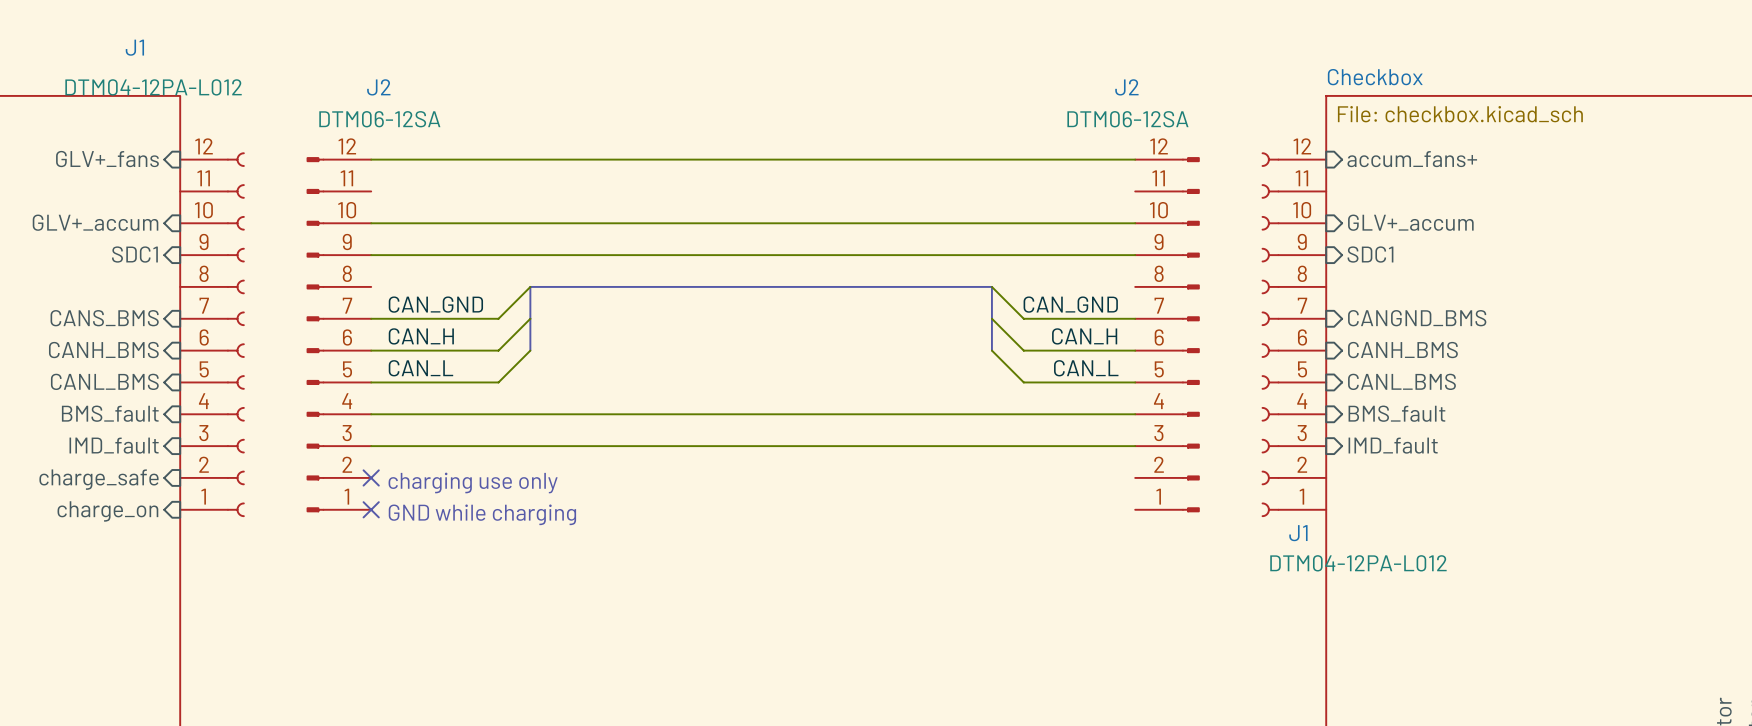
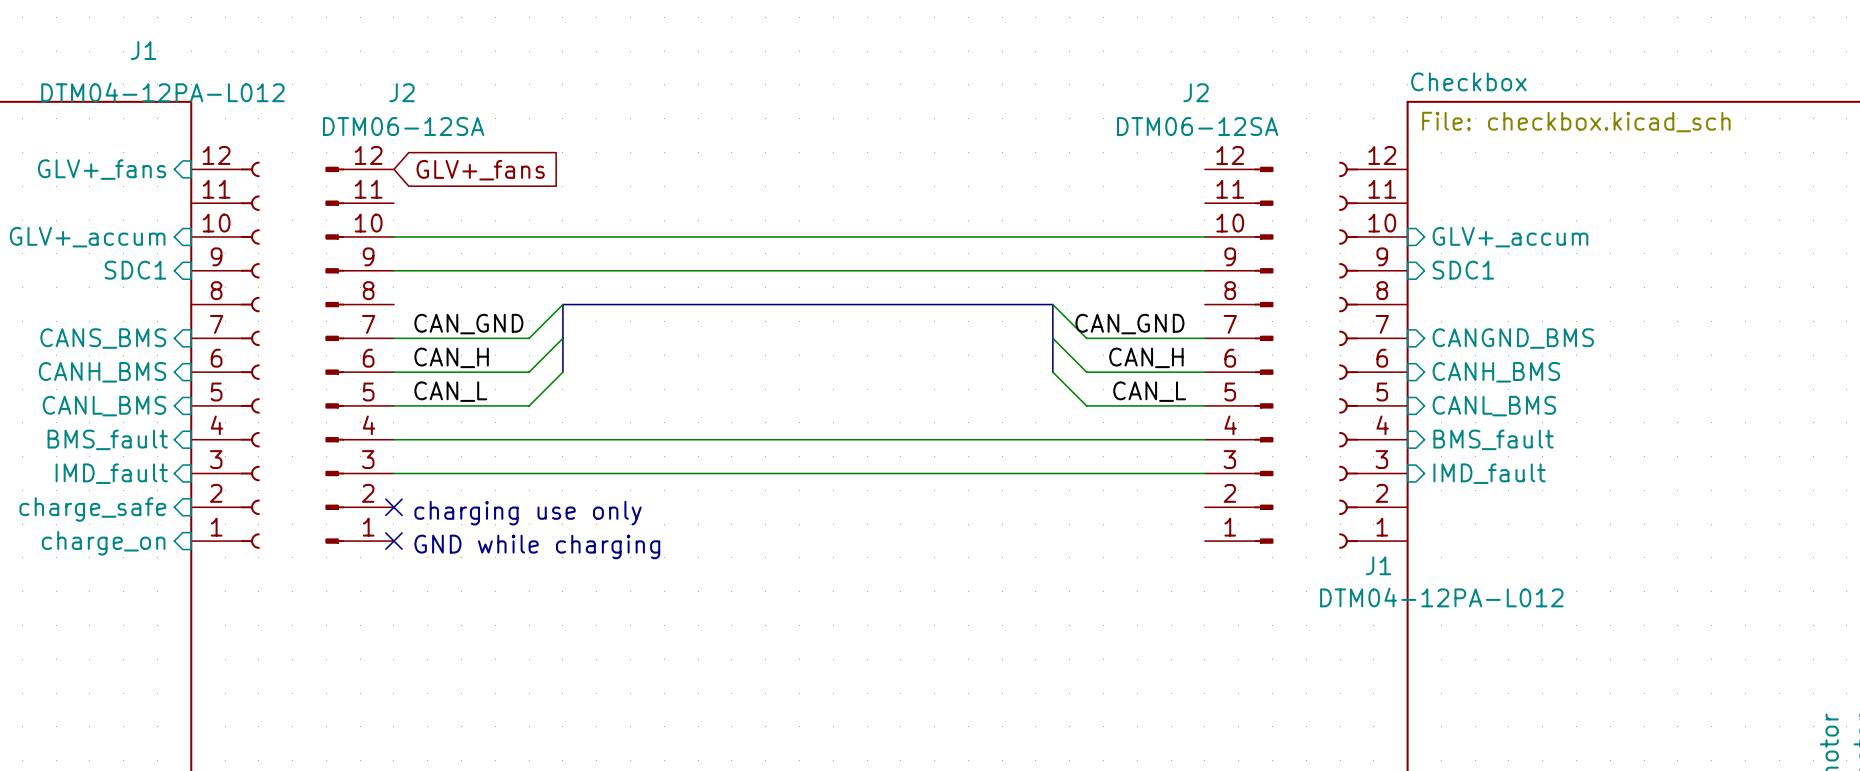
wire: (371, 159) (1135, 159) -> none
global label: none -> GLV+_fans (480, 170)
sheet pin: accum_fans+ (1412, 159) -> none

